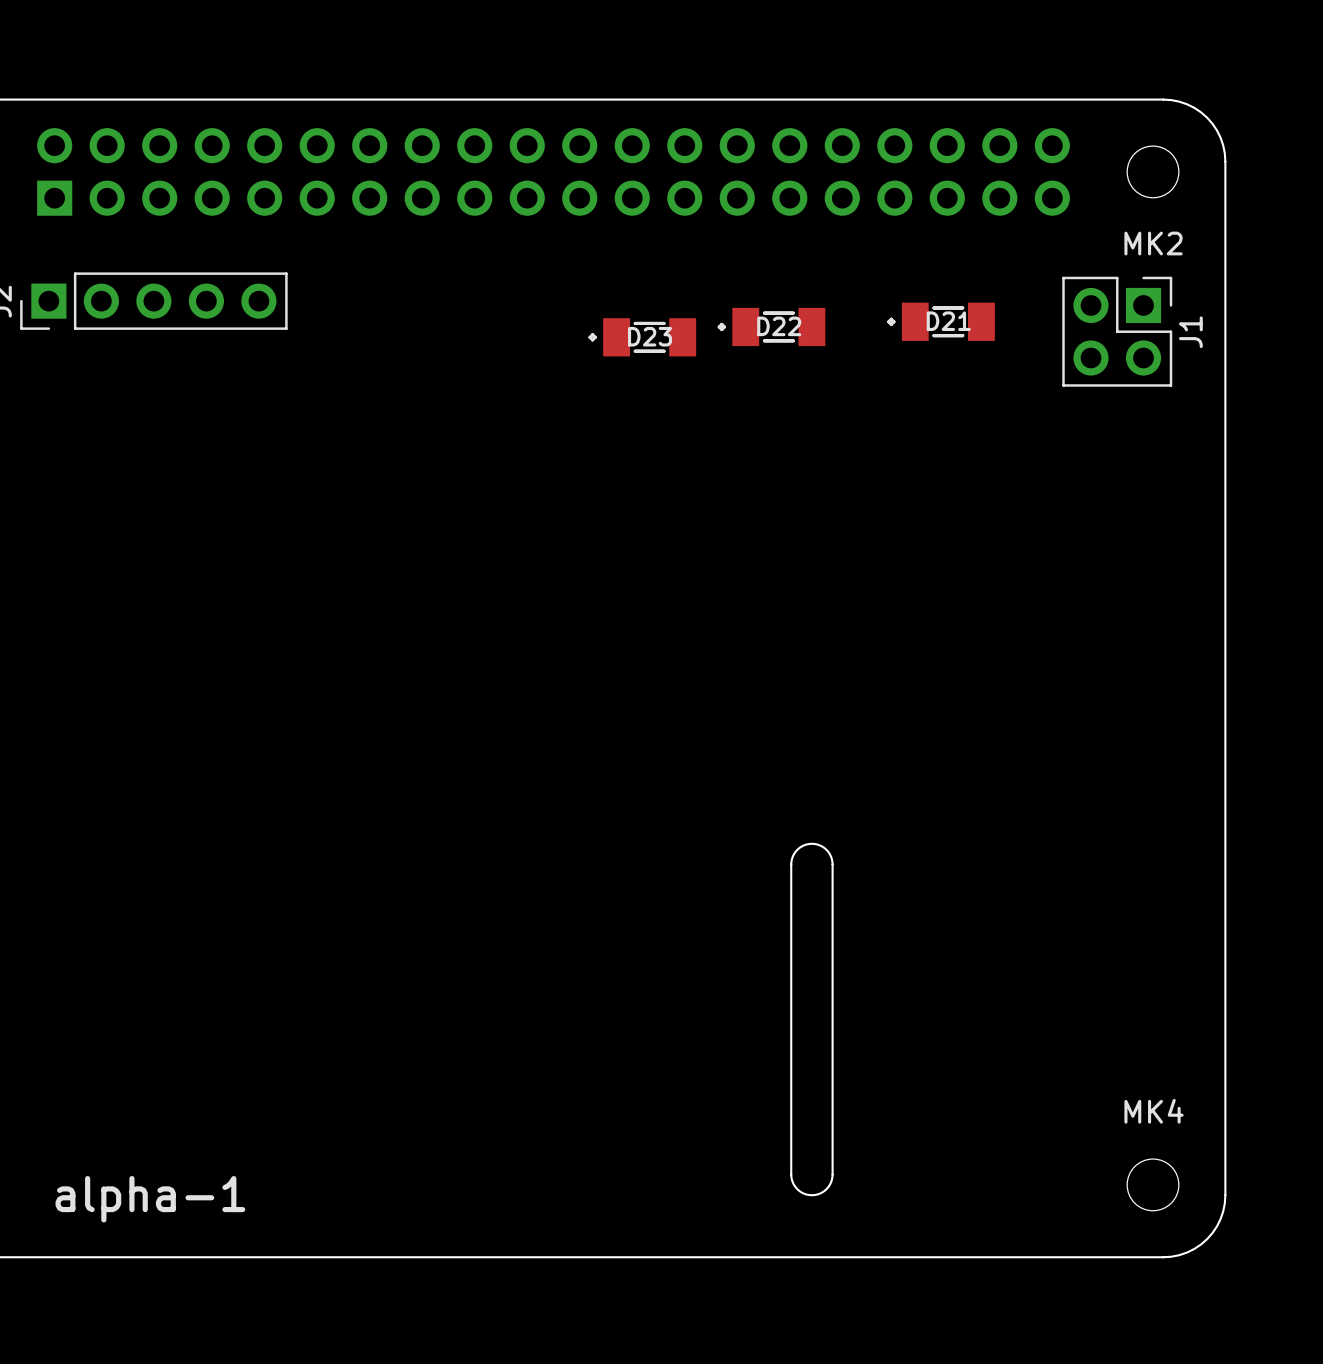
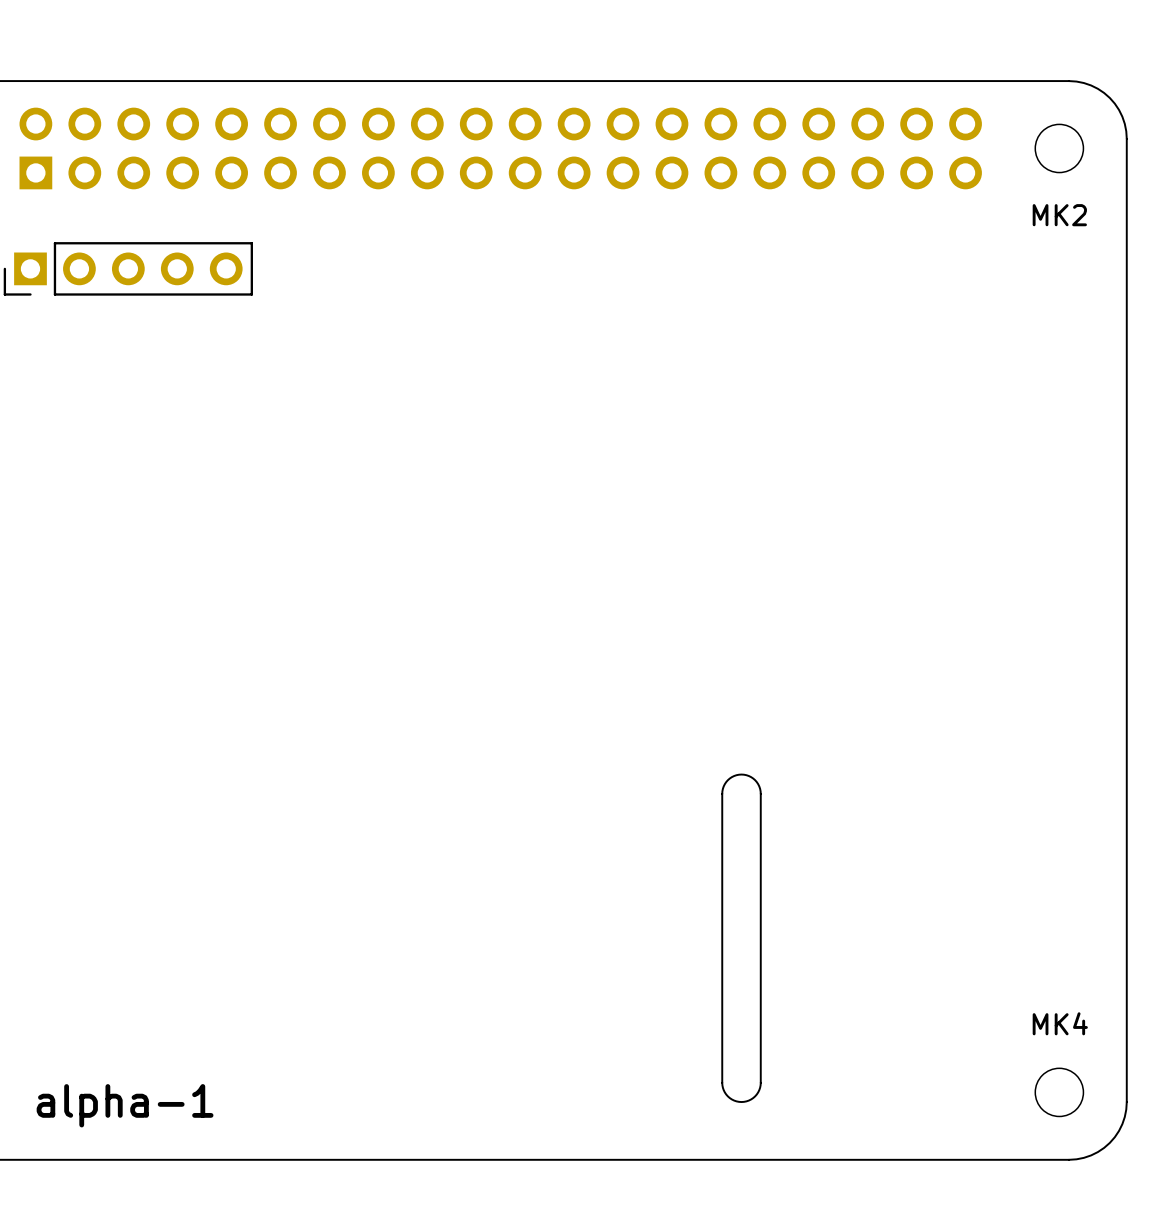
D21: (941, 321) -> none
D22: (771, 326) -> none
J1: (1117, 331) -> none
D23: (642, 337) -> none

